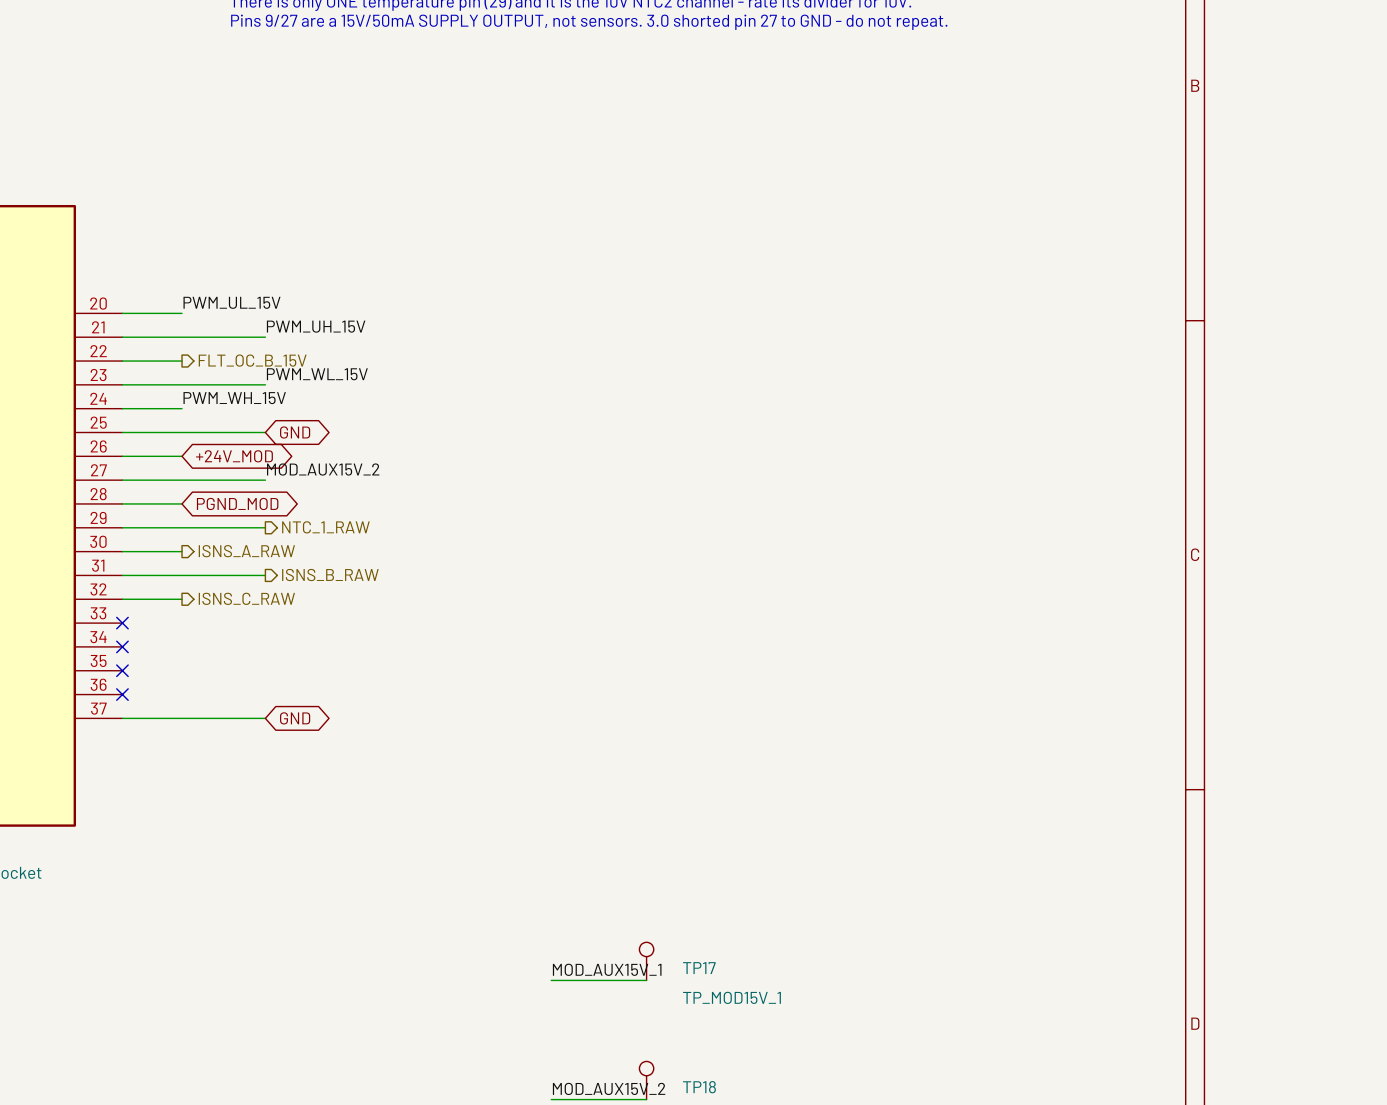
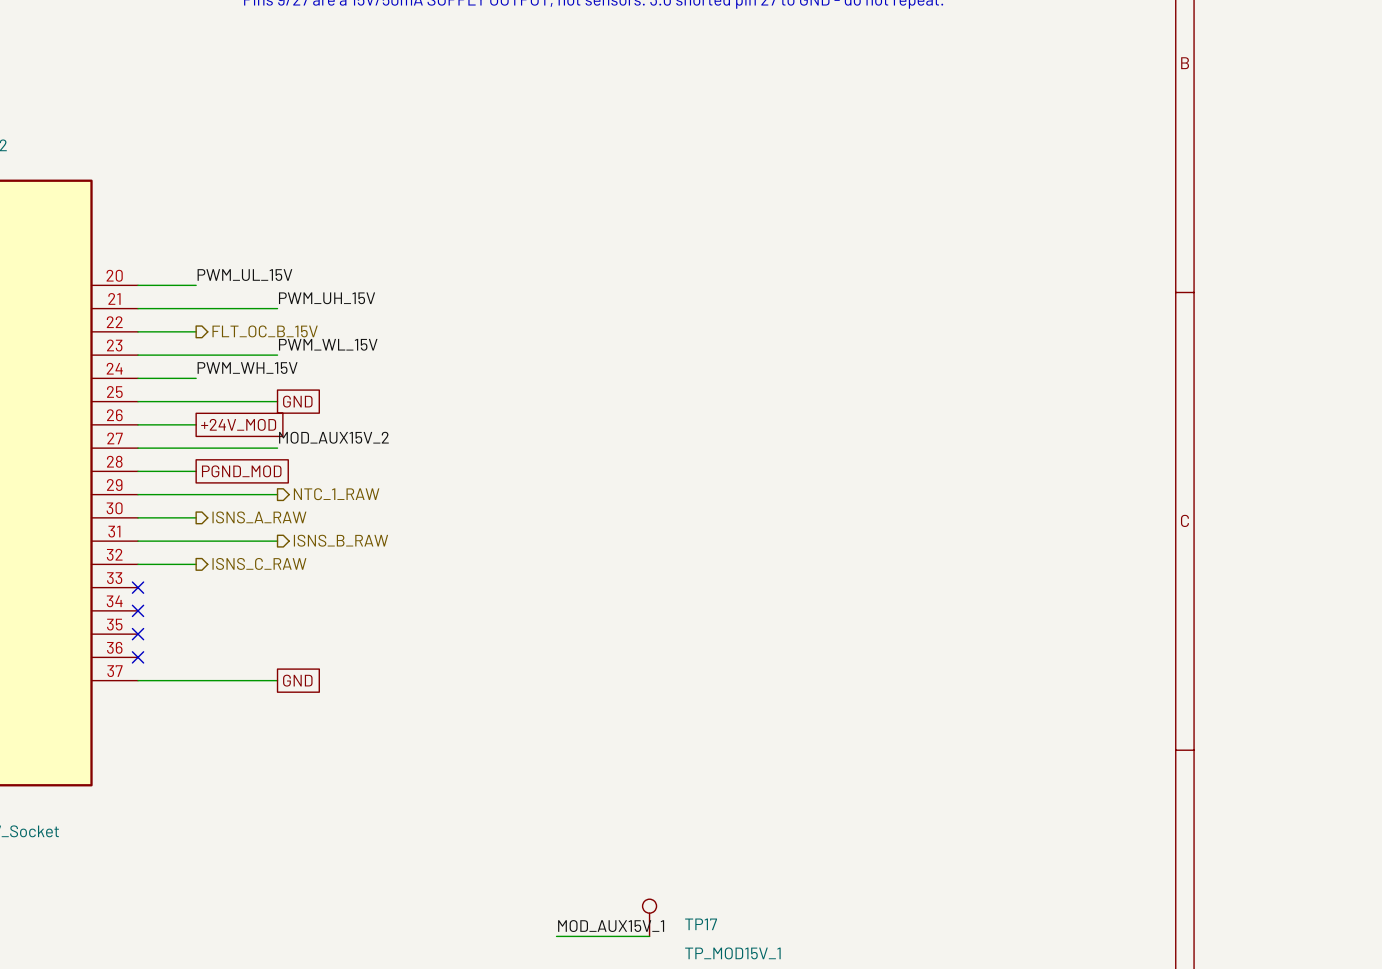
global label shape: bidirectional (295, 432) -> passive (297, 401)
global label shape: bidirectional (234, 456) -> passive (238, 424)
global label shape: bidirectional (237, 503) -> passive (241, 471)
global label shape: bidirectional (295, 718) -> passive (297, 680)

